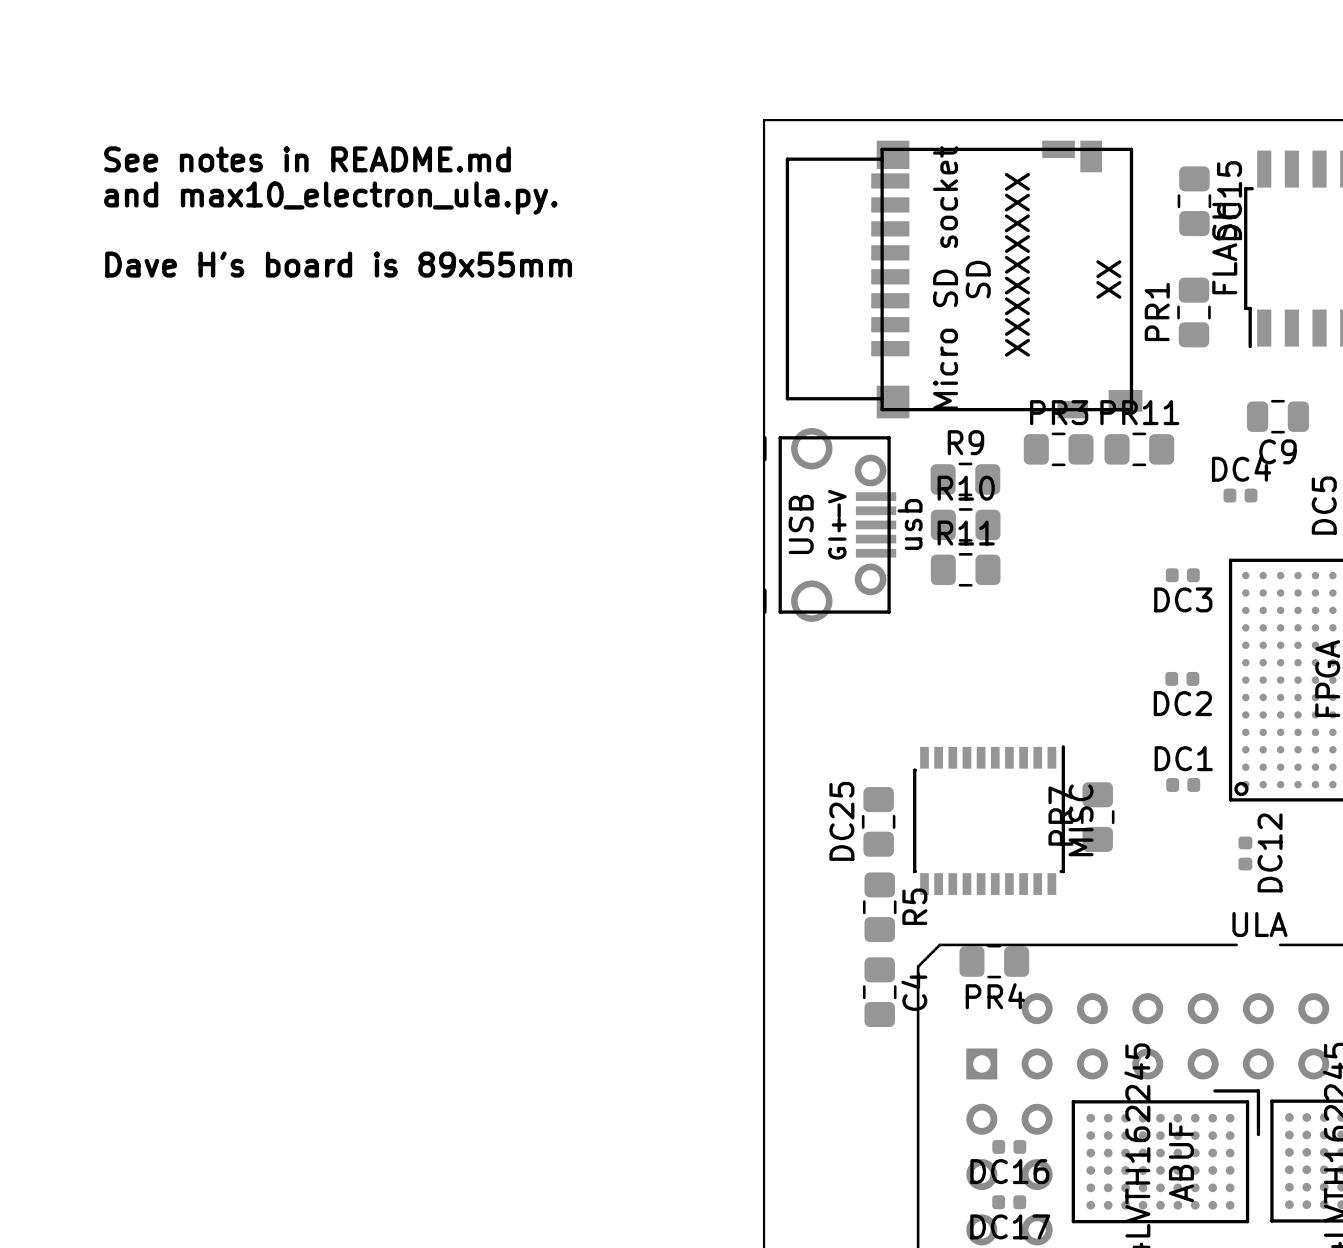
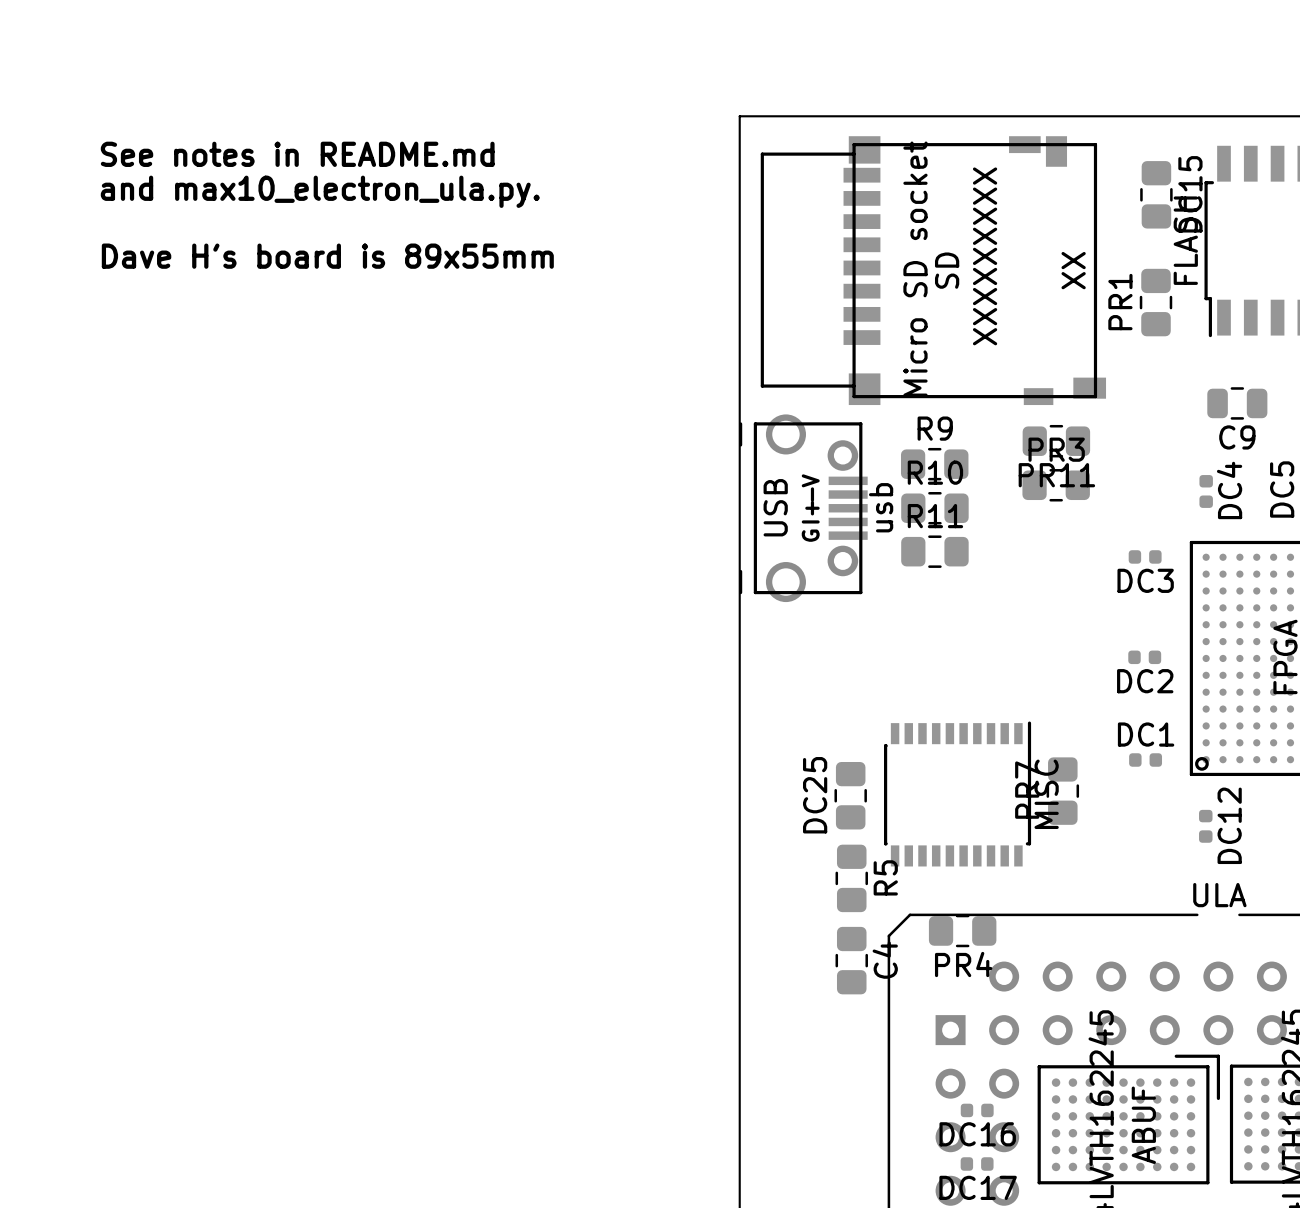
PR11 name position: PR11 (1139, 412) -> PR11 (1056, 475)
PR3 position: (1058, 449) -> (1056, 485)
PR11 position: (1139, 449) -> (1056, 441)
DC4 rotation: 0° (1240, 495) -> 90° clockwise (1206, 491)

